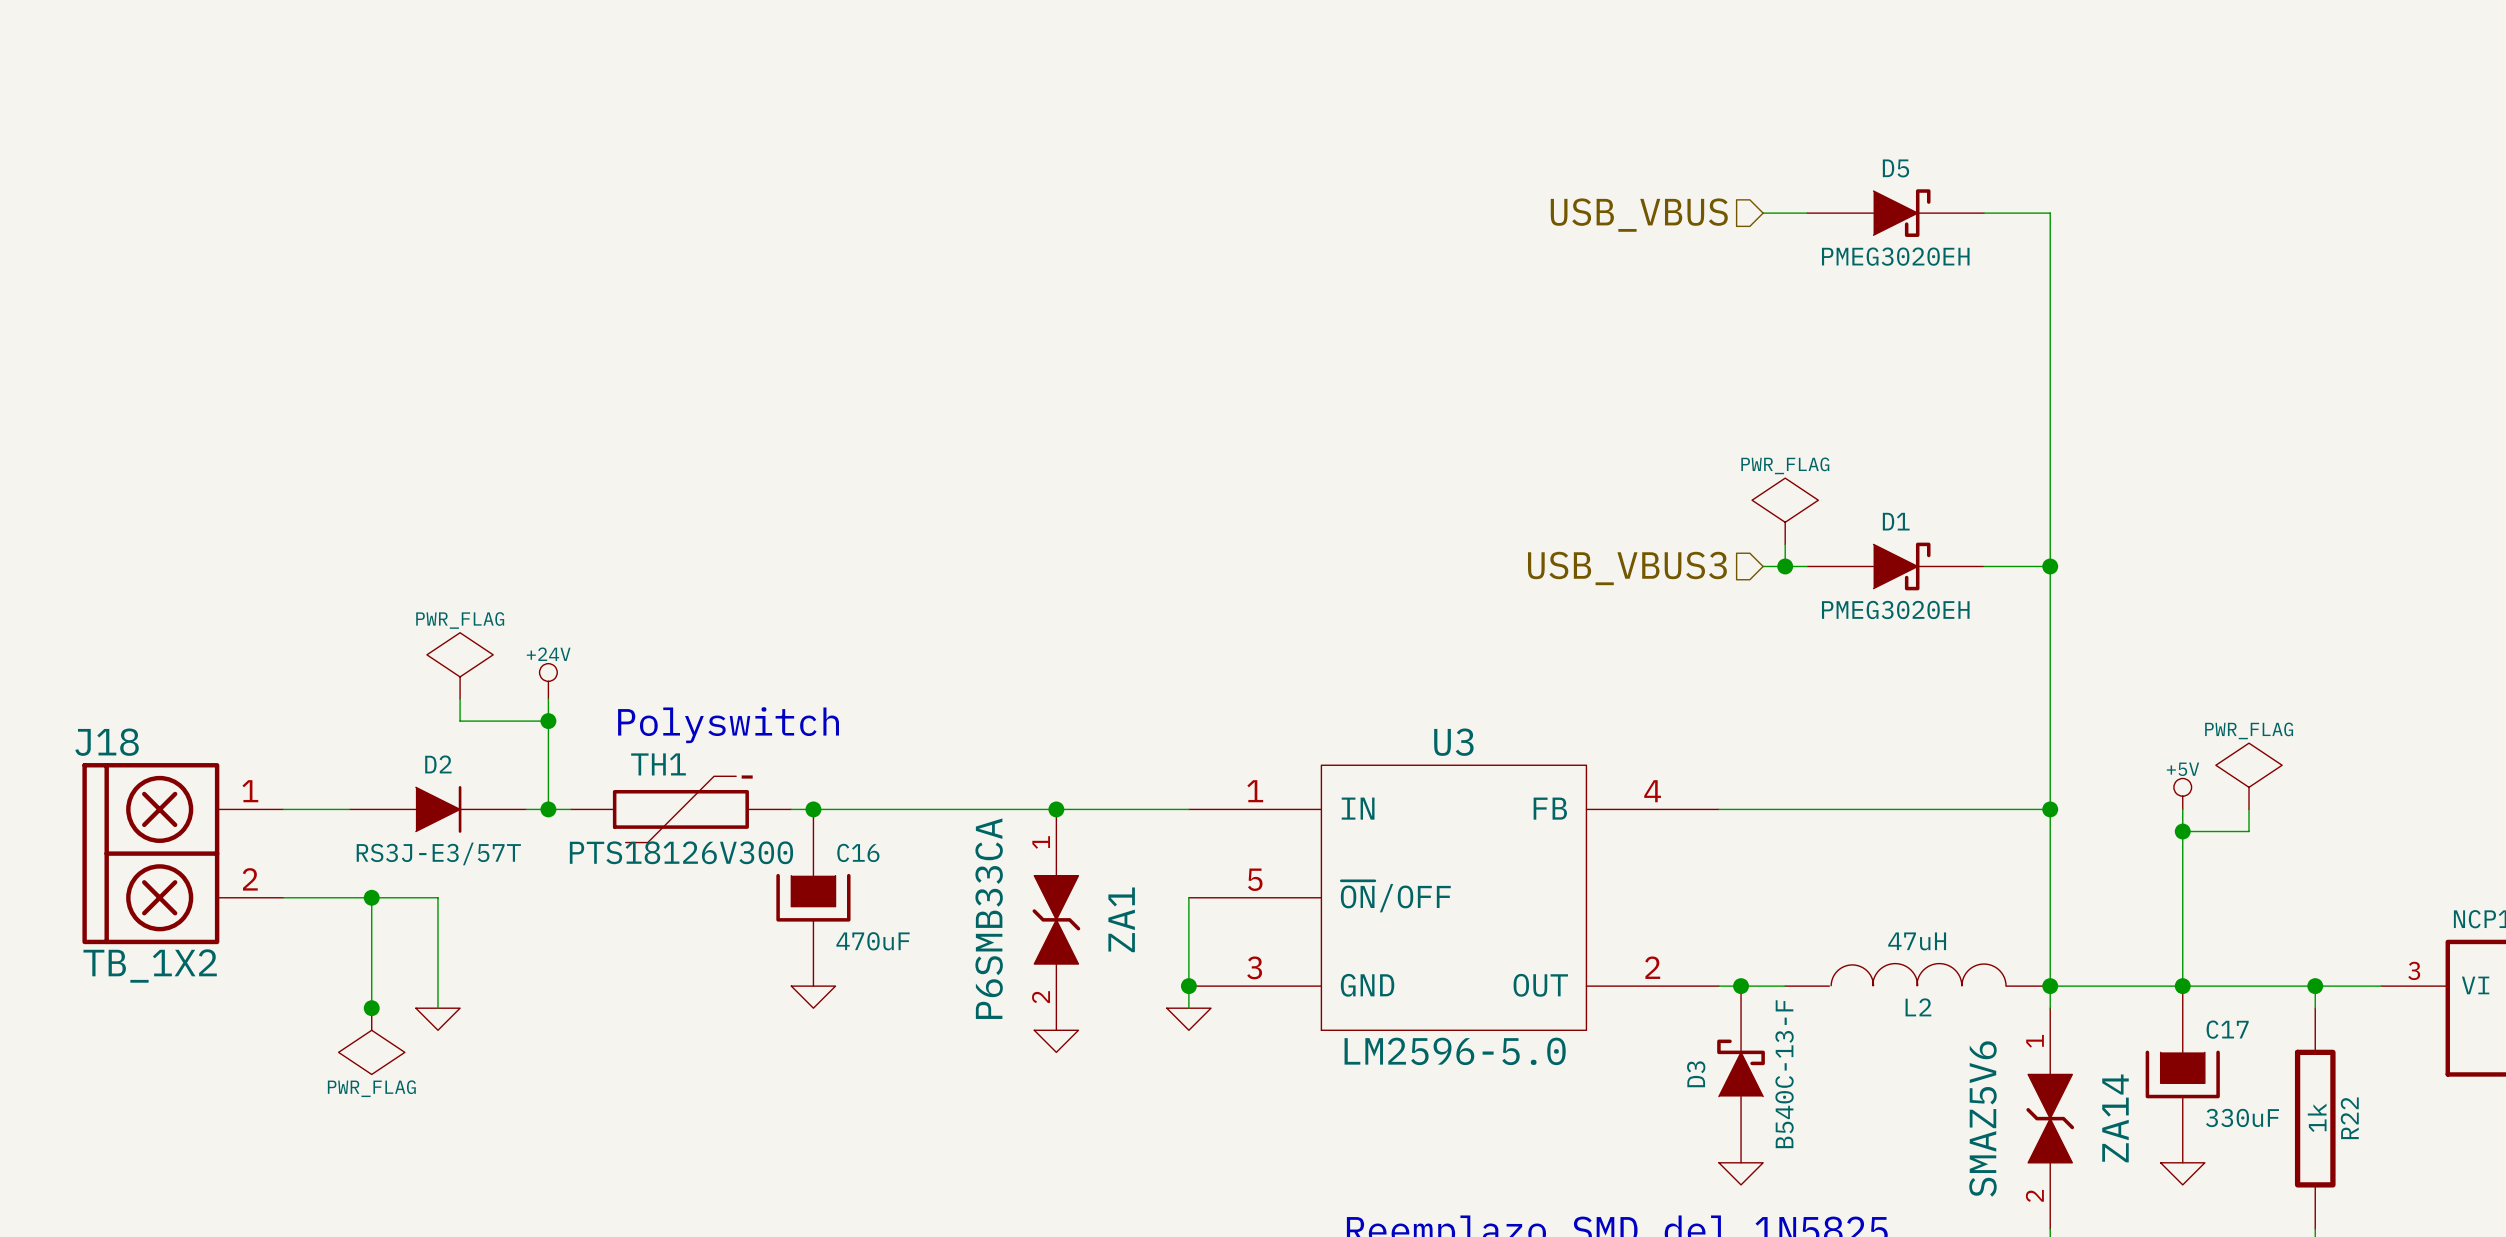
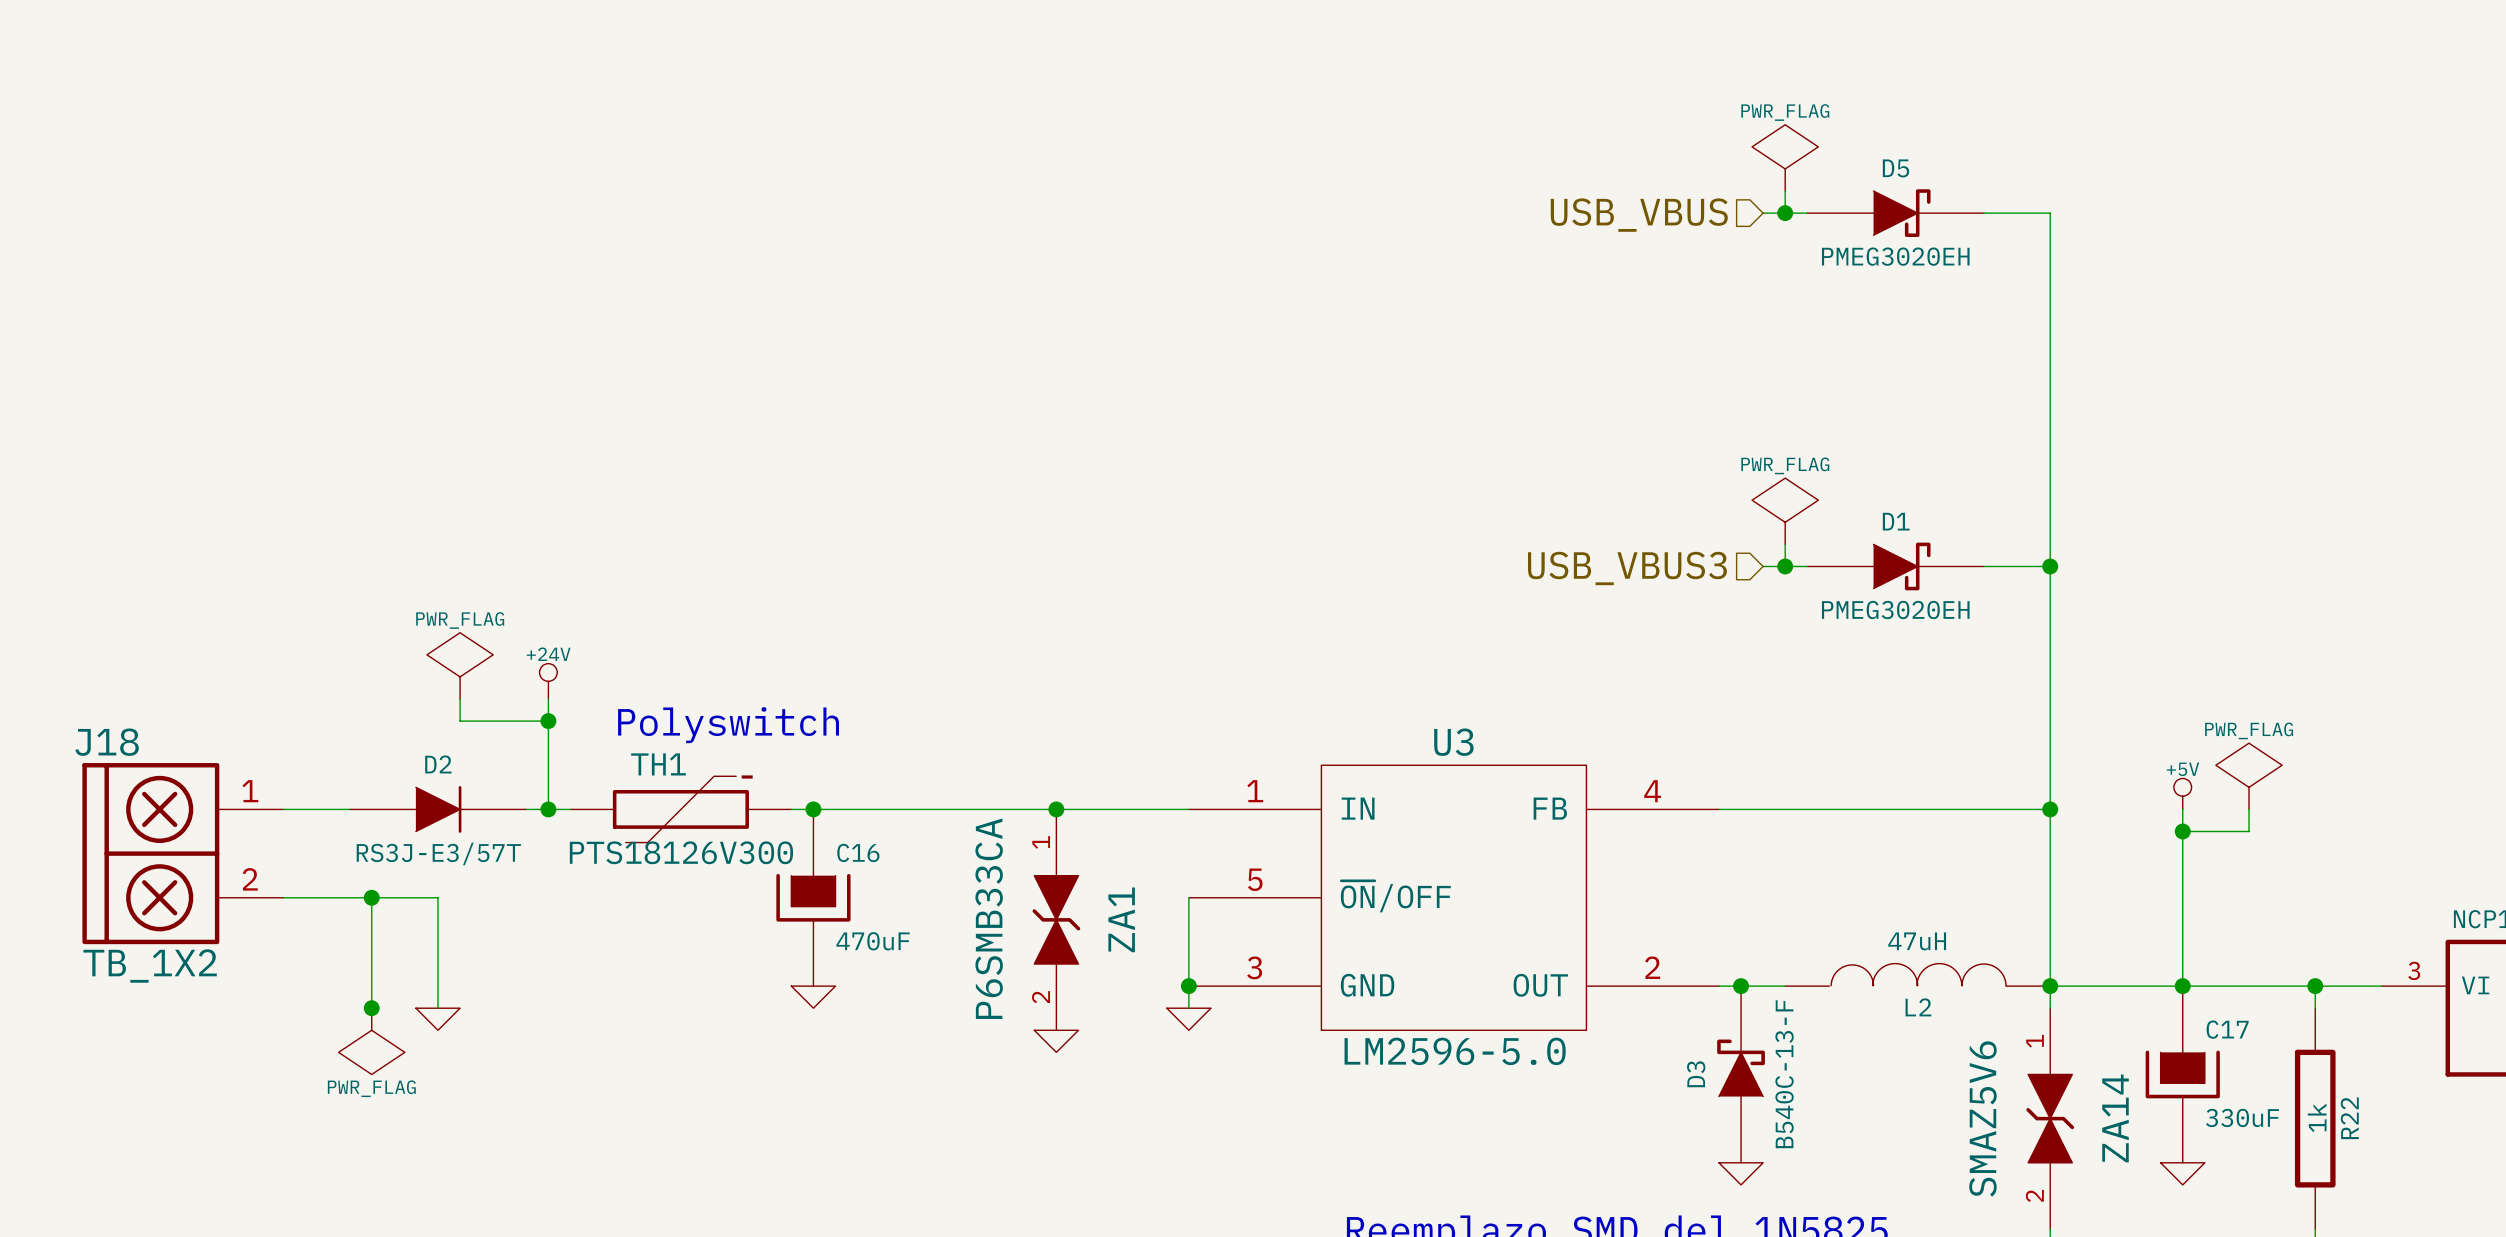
power symbol: none -> PWR_FLAG (1785, 157)
wire: none -> (1785, 191) (1785, 213)
junction: none -> (1785, 213)

